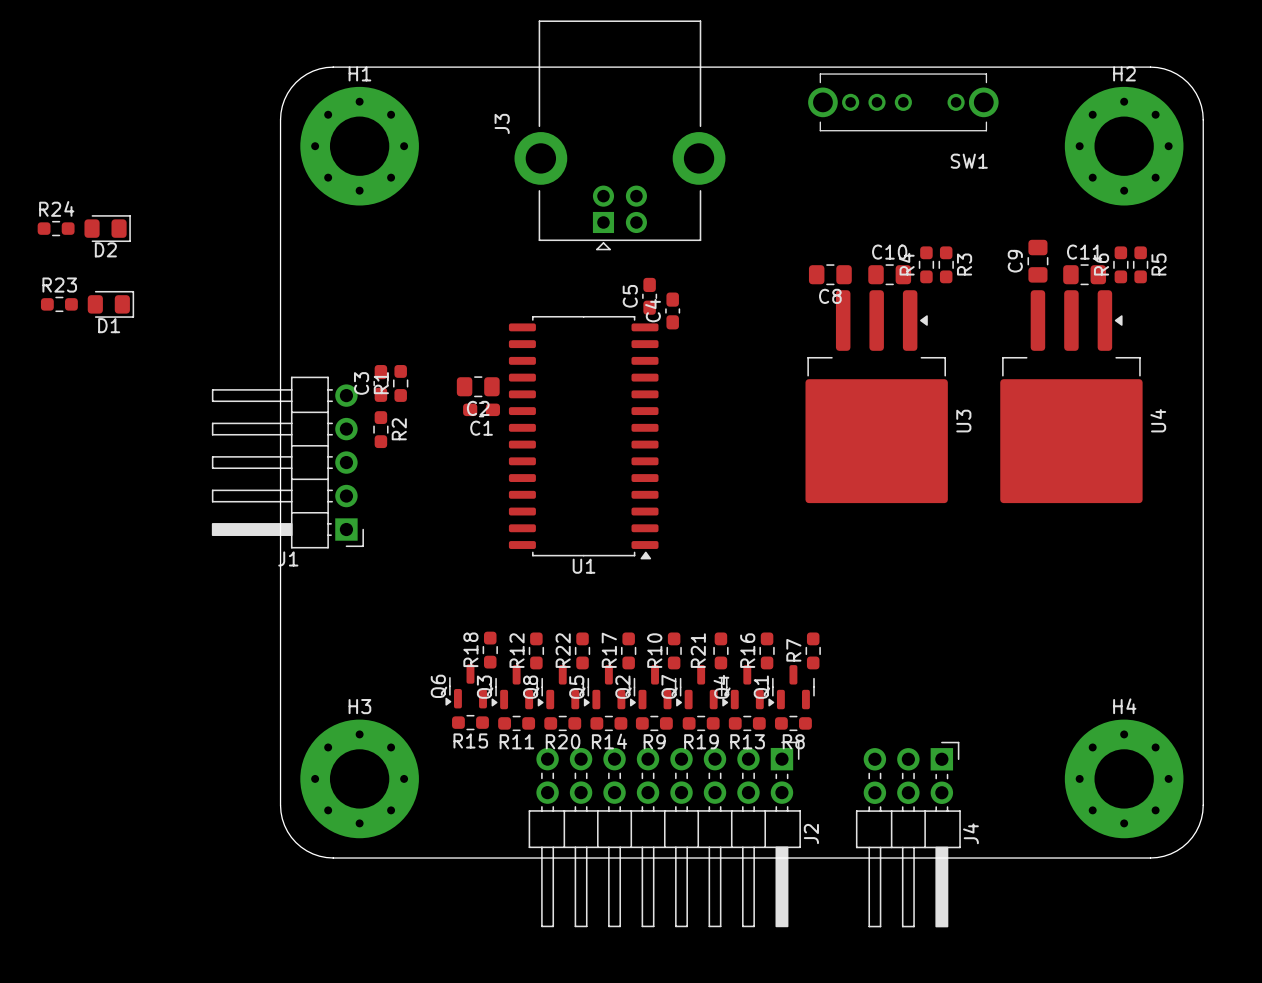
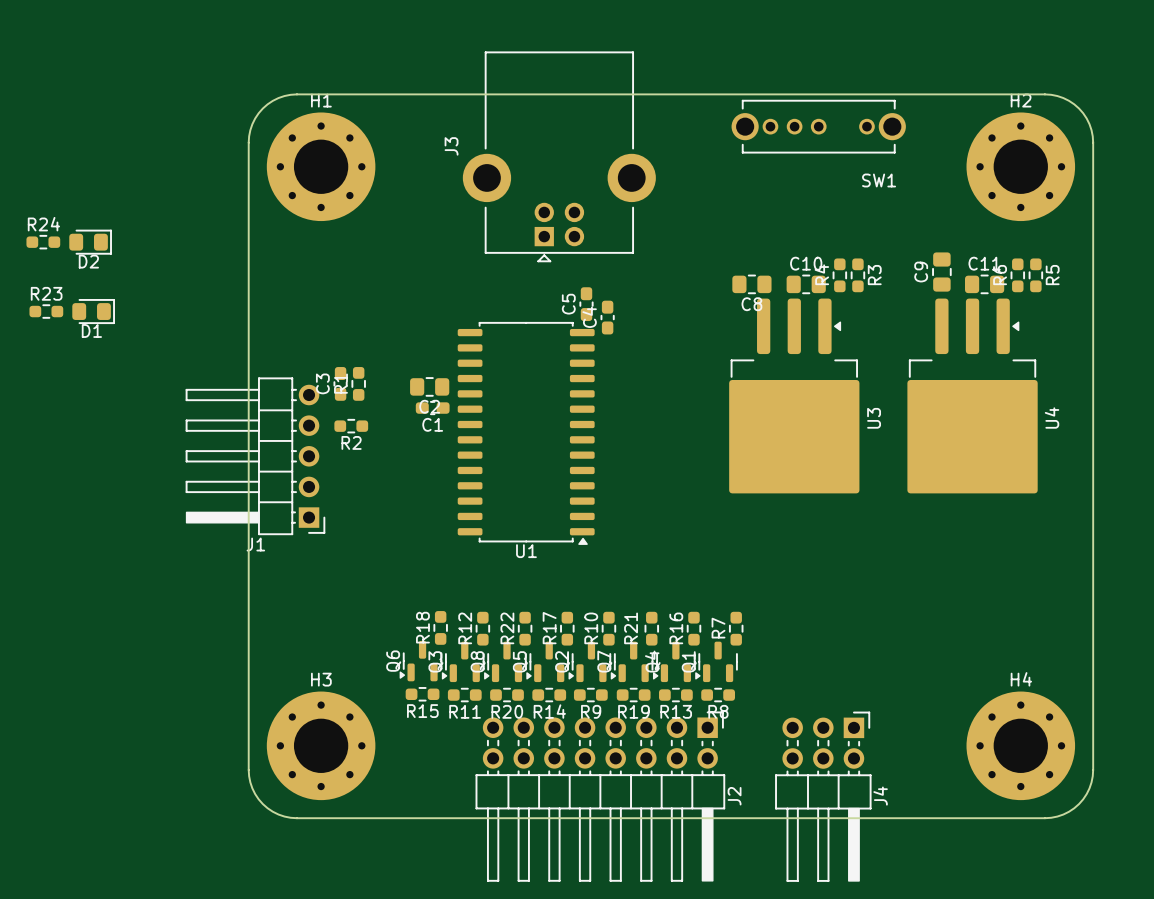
R2 rotation: 0° (380, 429) -> 90° clockwise (351, 426)

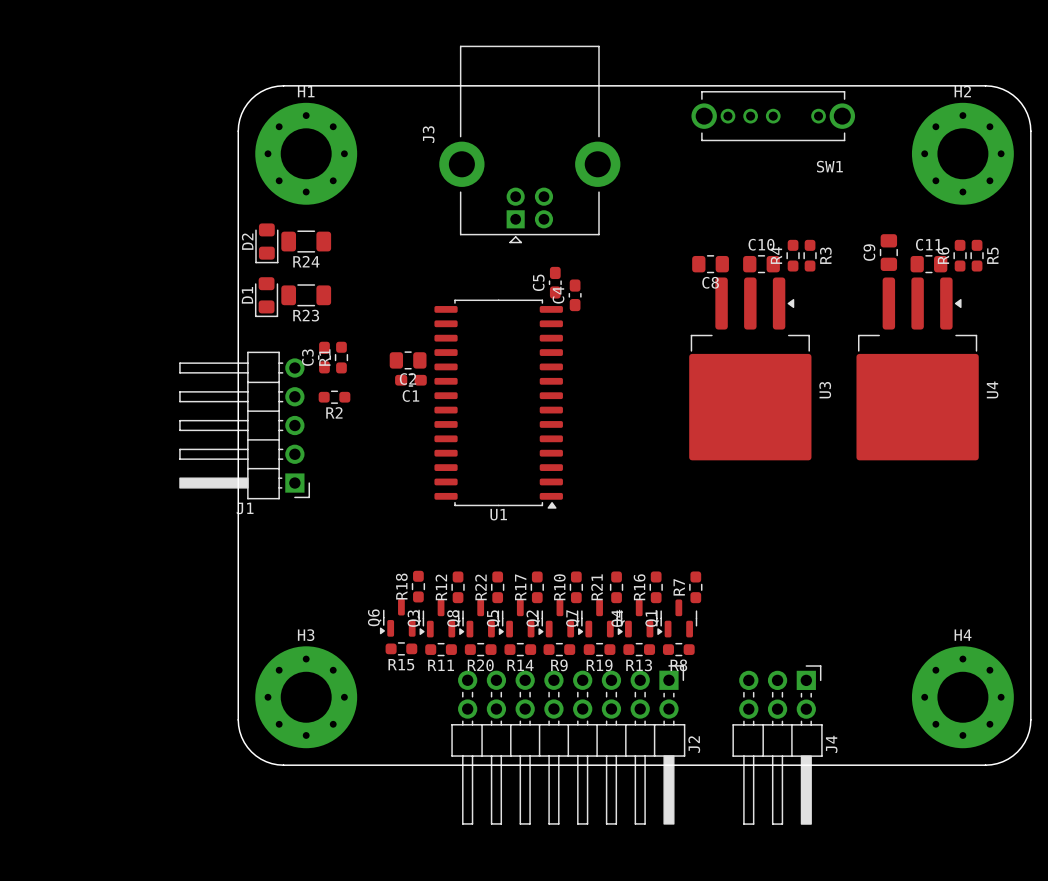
R24 name position: R24 (43, 224) -> R24 (306, 261)
R24 footprint: [26, 235, 61, 250] -> [281, 230, 332, 253]
D2 rotation: 0° (90, 242) -> 90° clockwise (266, 243)
D2 position: (90, 242) -> (266, 243)
R23 name position: R23 (46, 293) -> R23 (306, 315)
R23 footprint: [29, 304, 64, 319] -> [281, 284, 332, 307]
D1 rotation: 0° (93, 311) -> 90° clockwise (266, 297)
D1 position: (93, 311) -> (266, 297)

